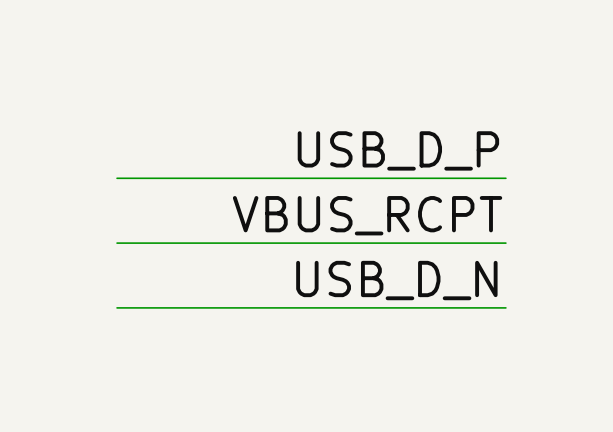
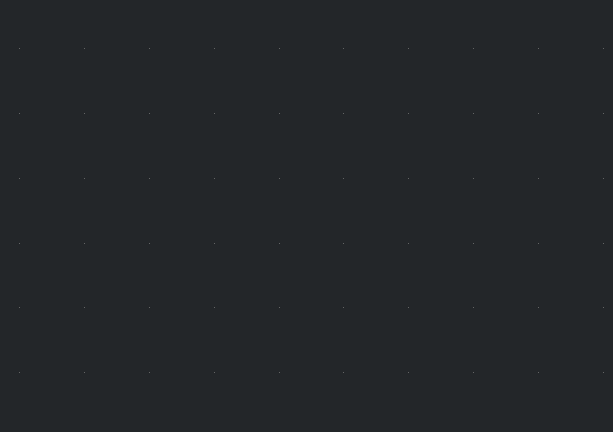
label: USB_D_P (398, 150) -> none
wire: (117, 178) (505, 178) -> none
label: VBUS_RCPT (367, 215) -> none
wire: (117, 243) (505, 243) -> none
label: USB_D_N (396, 280) -> none
wire: (117, 307) (505, 307) -> none

